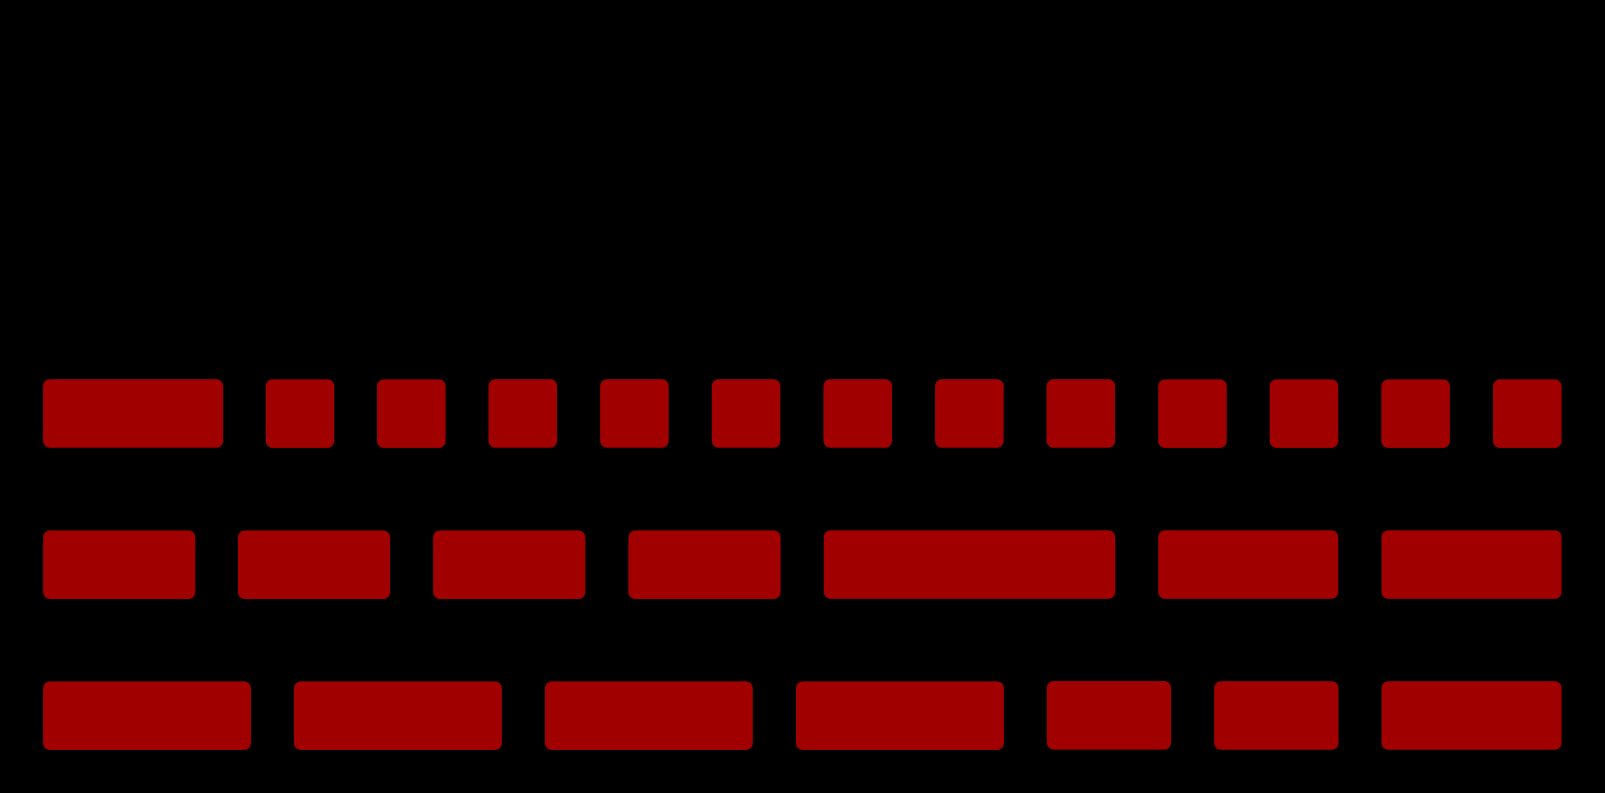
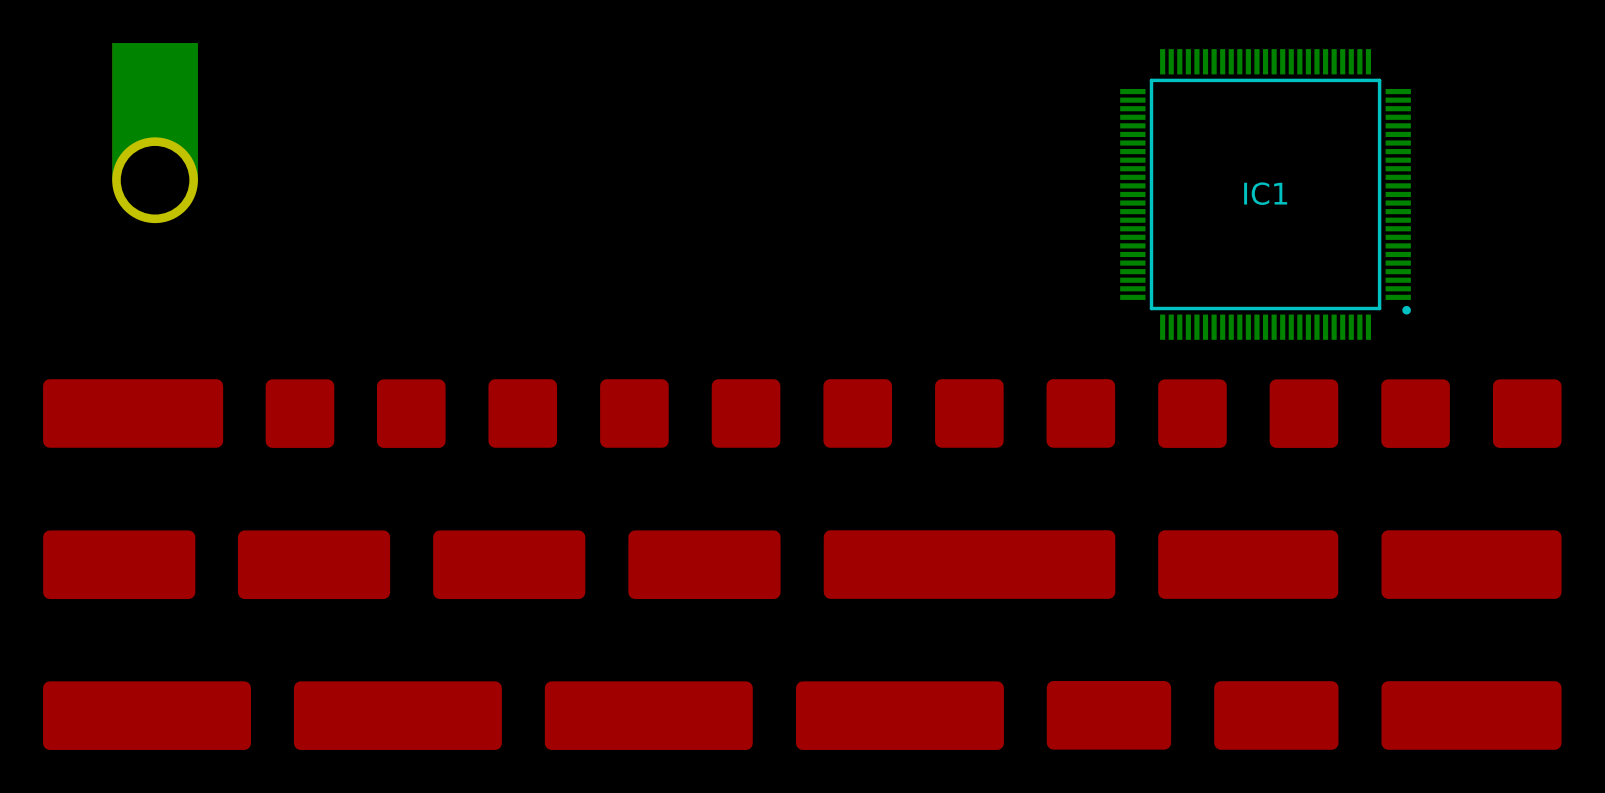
part: none -> (155, 133)
IC1: none -> (1265, 194)

